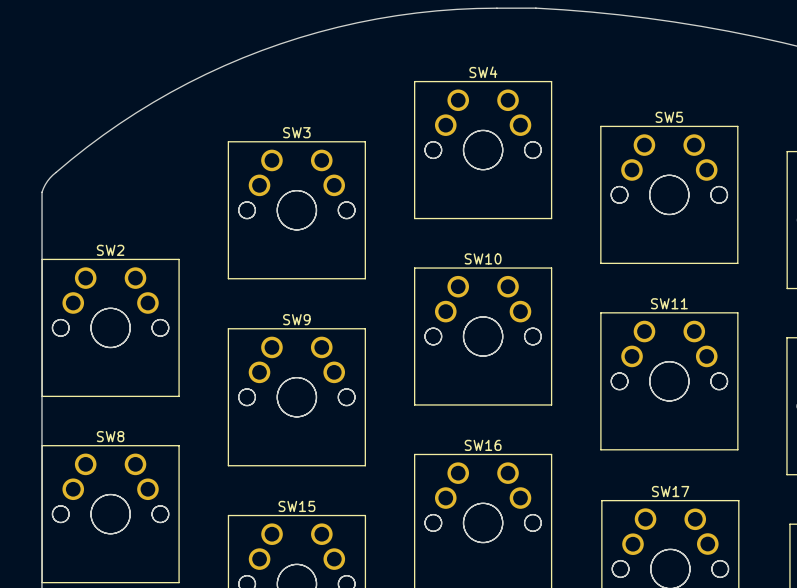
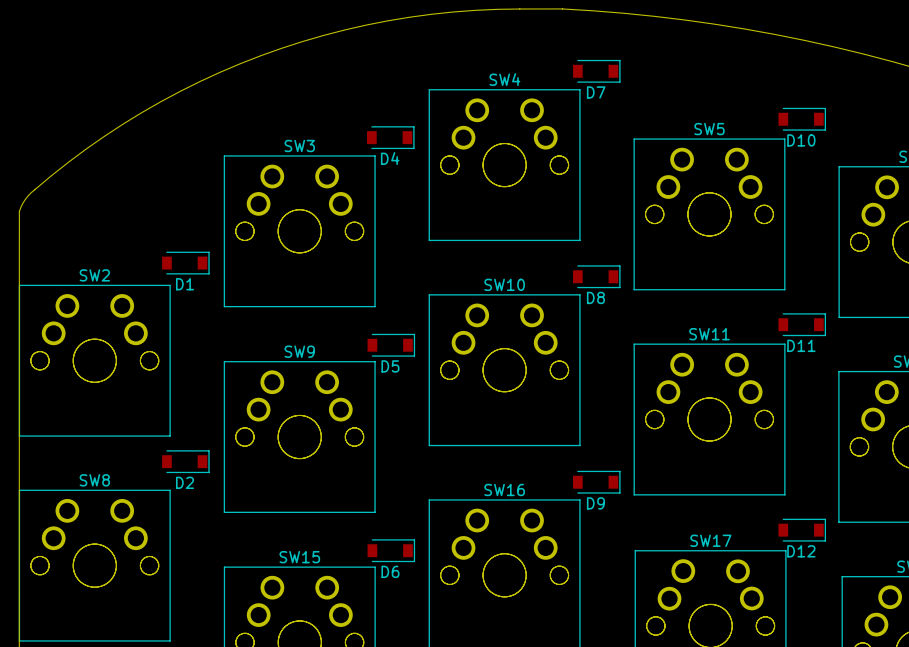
D7: none -> (596, 71)
D10: none -> (802, 119)
D4: none -> (390, 137)
D1: none -> (185, 263)
D8: none -> (596, 276)
D11: none -> (802, 324)
D5: none -> (391, 345)
D2: none -> (185, 461)
D9: none -> (596, 482)
D12: none -> (802, 530)
D6: none -> (391, 550)

